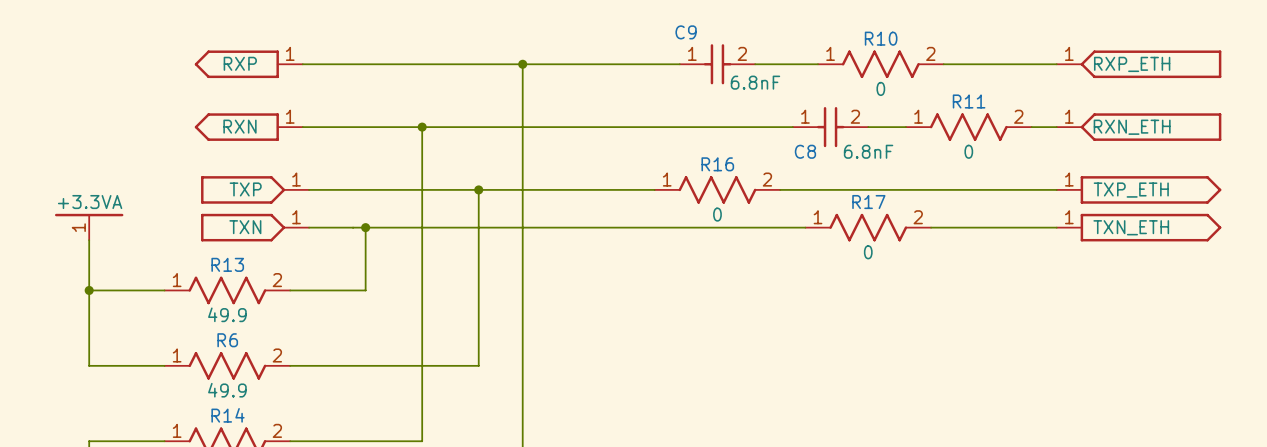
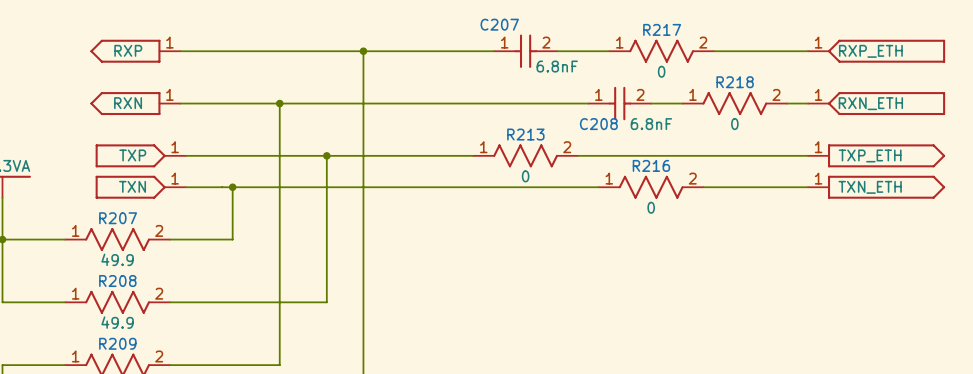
C9 name: C9 (686, 32) -> C207 (499, 24)
R10 name: R10 (881, 38) -> R217 (662, 29)
R11 name: R11 (969, 101) -> R218 (735, 82)
C8 name: C8 (805, 151) -> C208 (598, 124)
R16 name: R16 (717, 164) -> R213 (525, 134)
R17 name: R17 (868, 202) -> R216 (651, 165)
R13 name: R13 (227, 264) -> R207 (118, 218)
R6 name: R6 (227, 340) -> R208 (117, 281)
R14 name: R14 (228, 415) -> R209 (117, 343)

